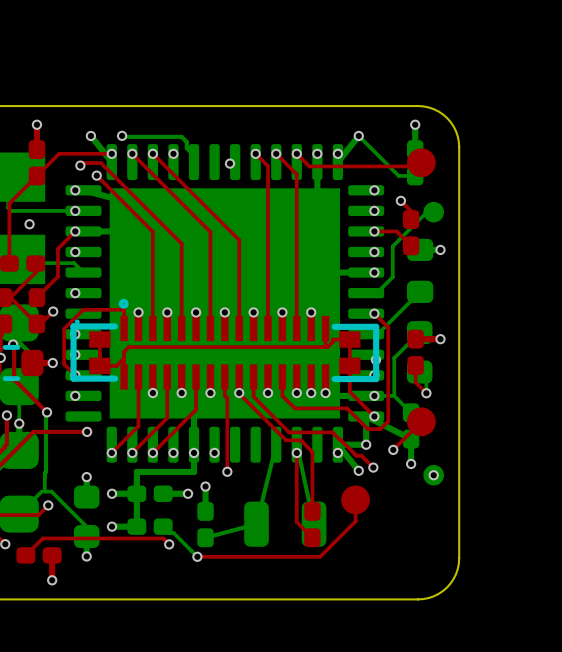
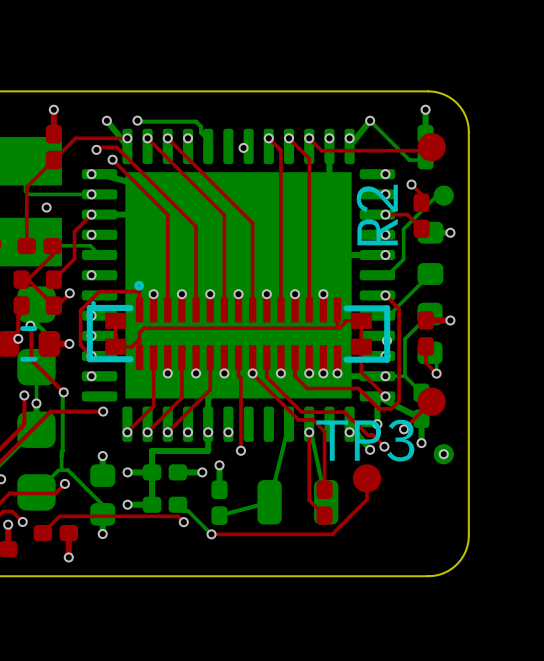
R2 name: none -> R2 (377, 215)
TP3 name: none -> TP3 (365, 440)

